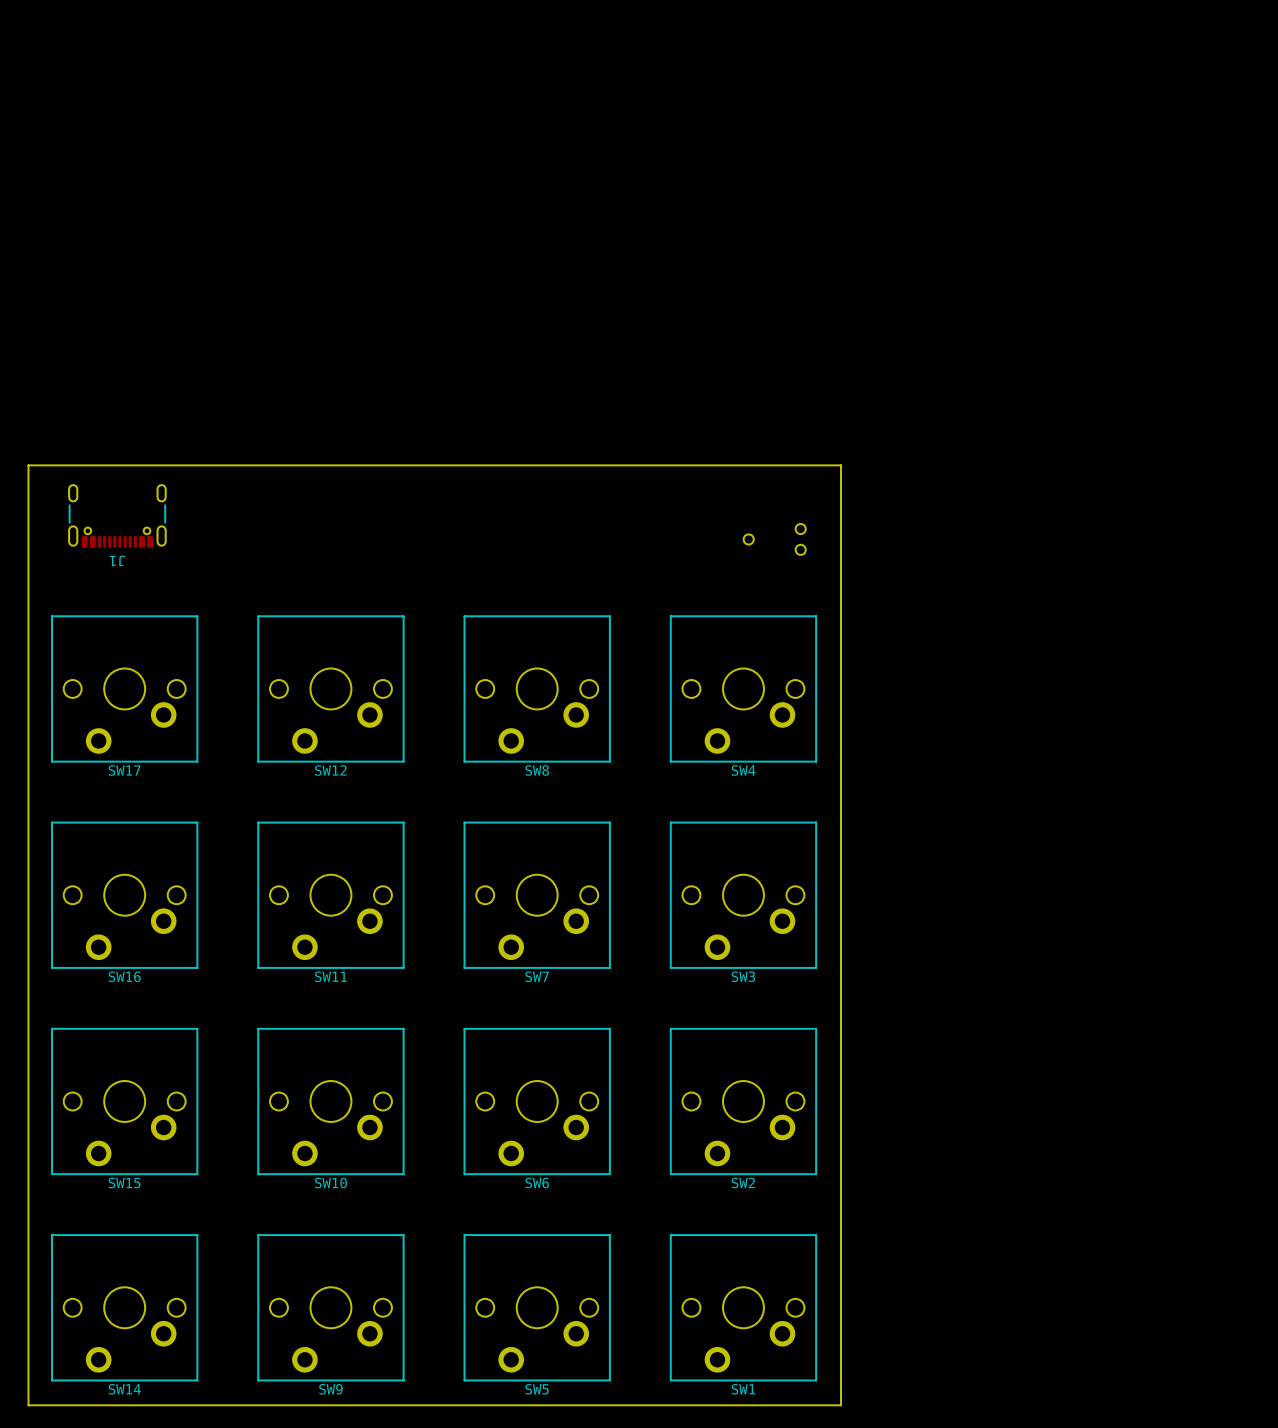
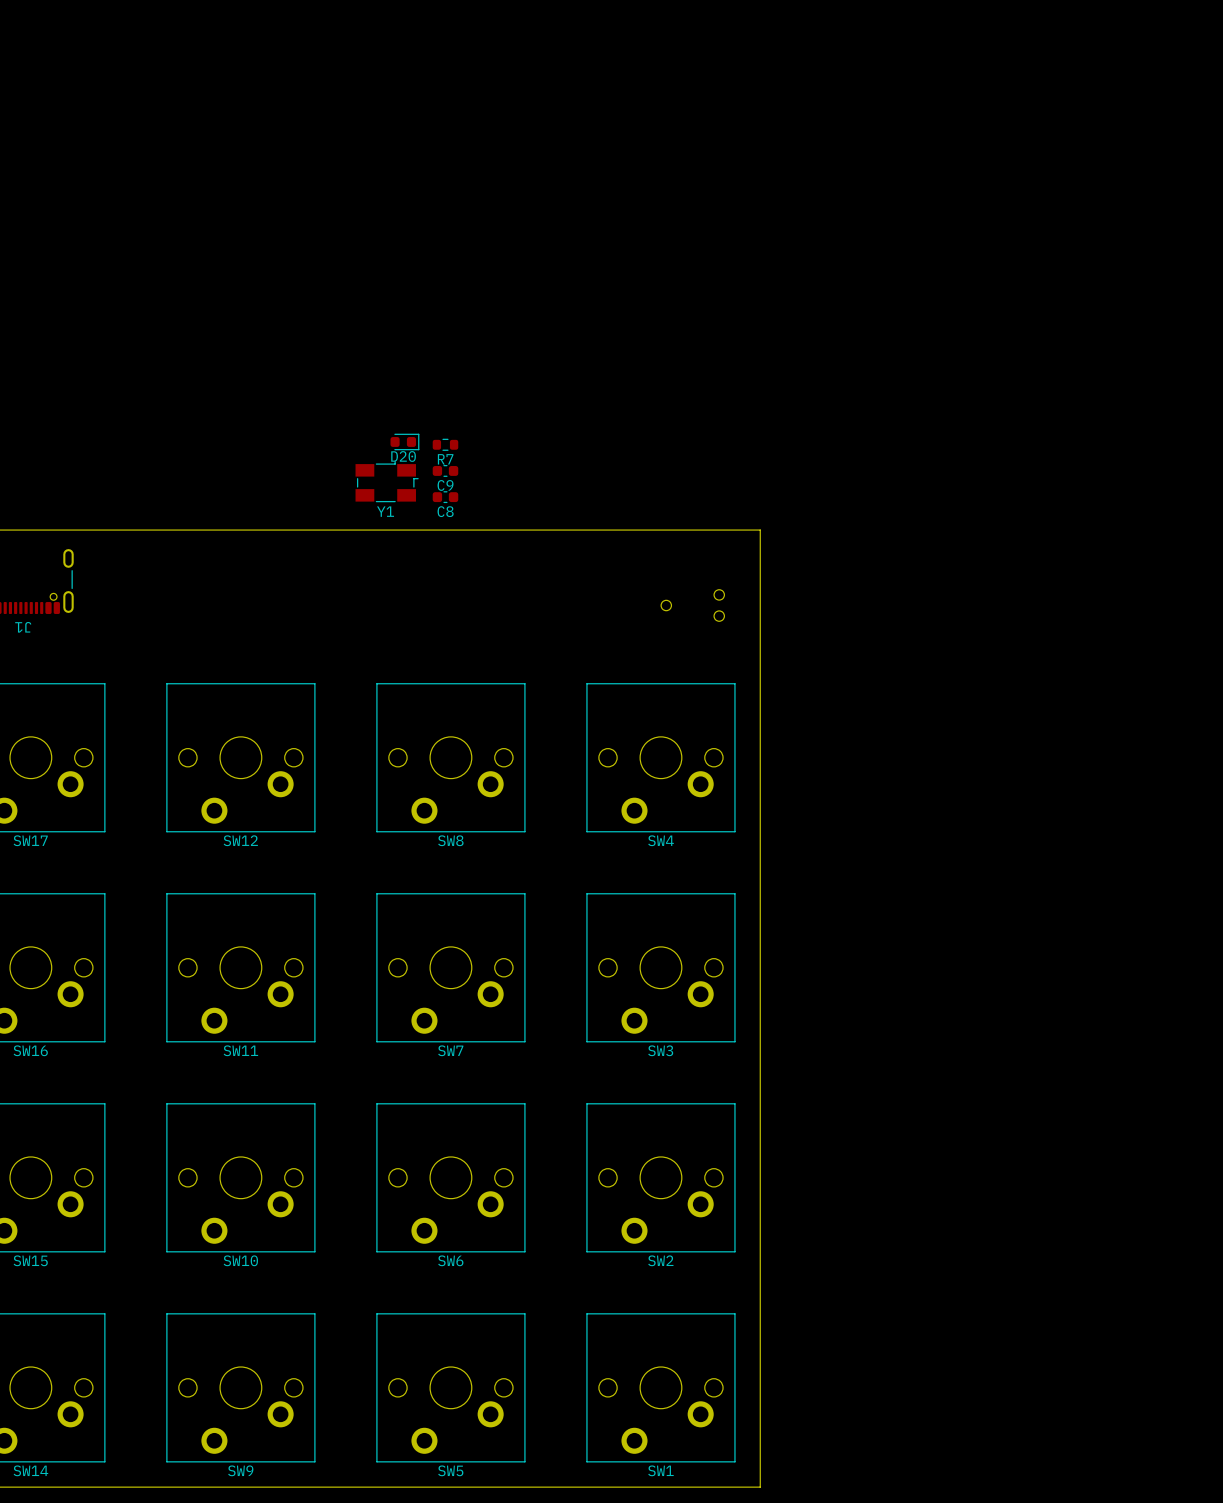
D20: none -> (404, 441)
R7: none -> (445, 444)
C9: none -> (445, 470)
Y1: none -> (387, 481)
C8: none -> (445, 497)

